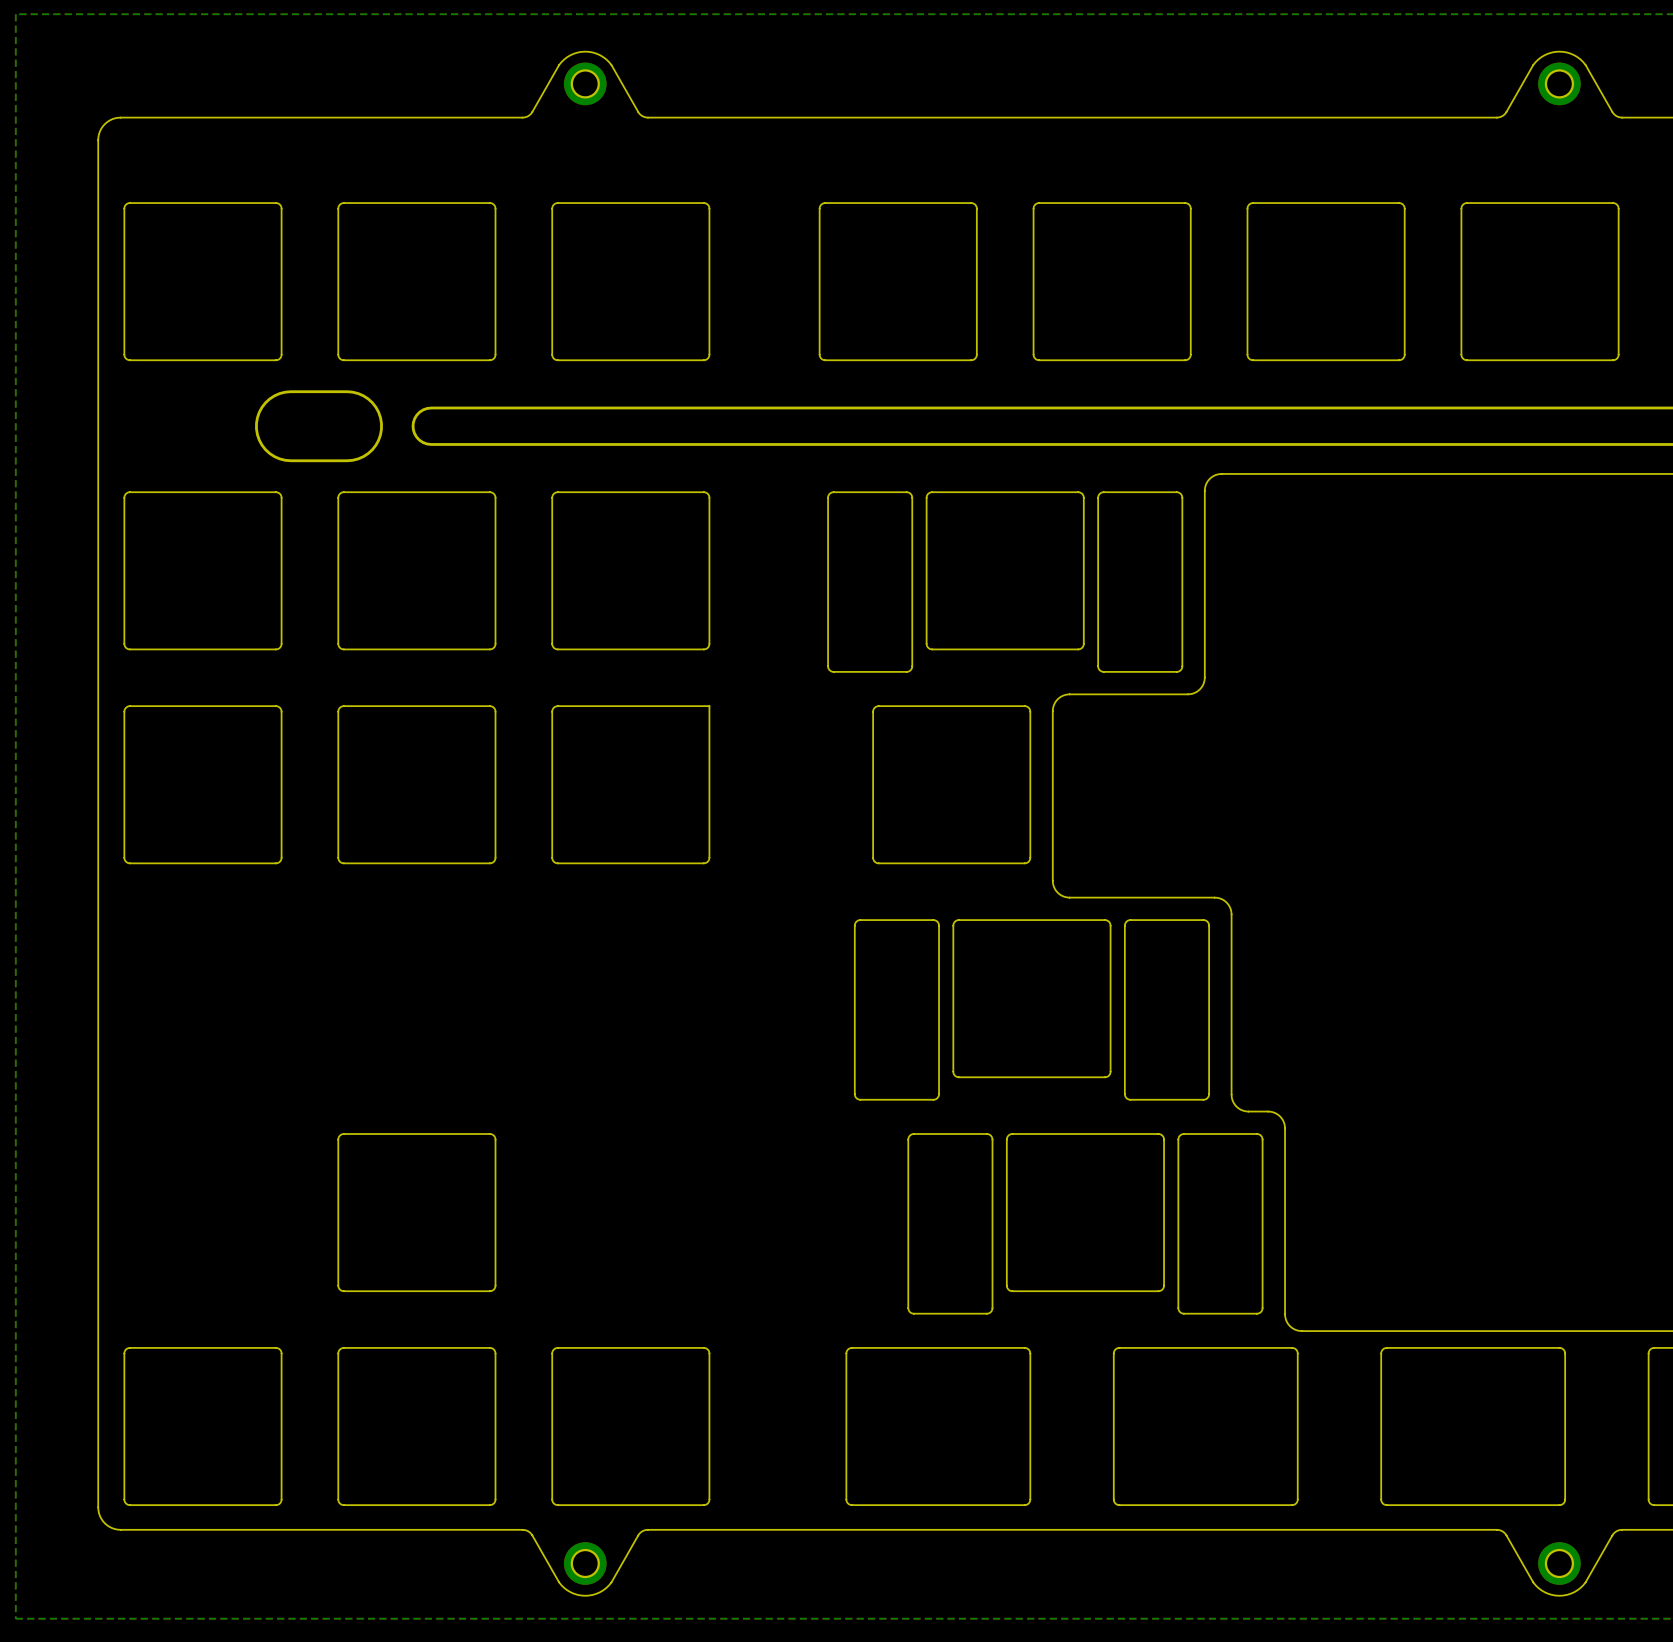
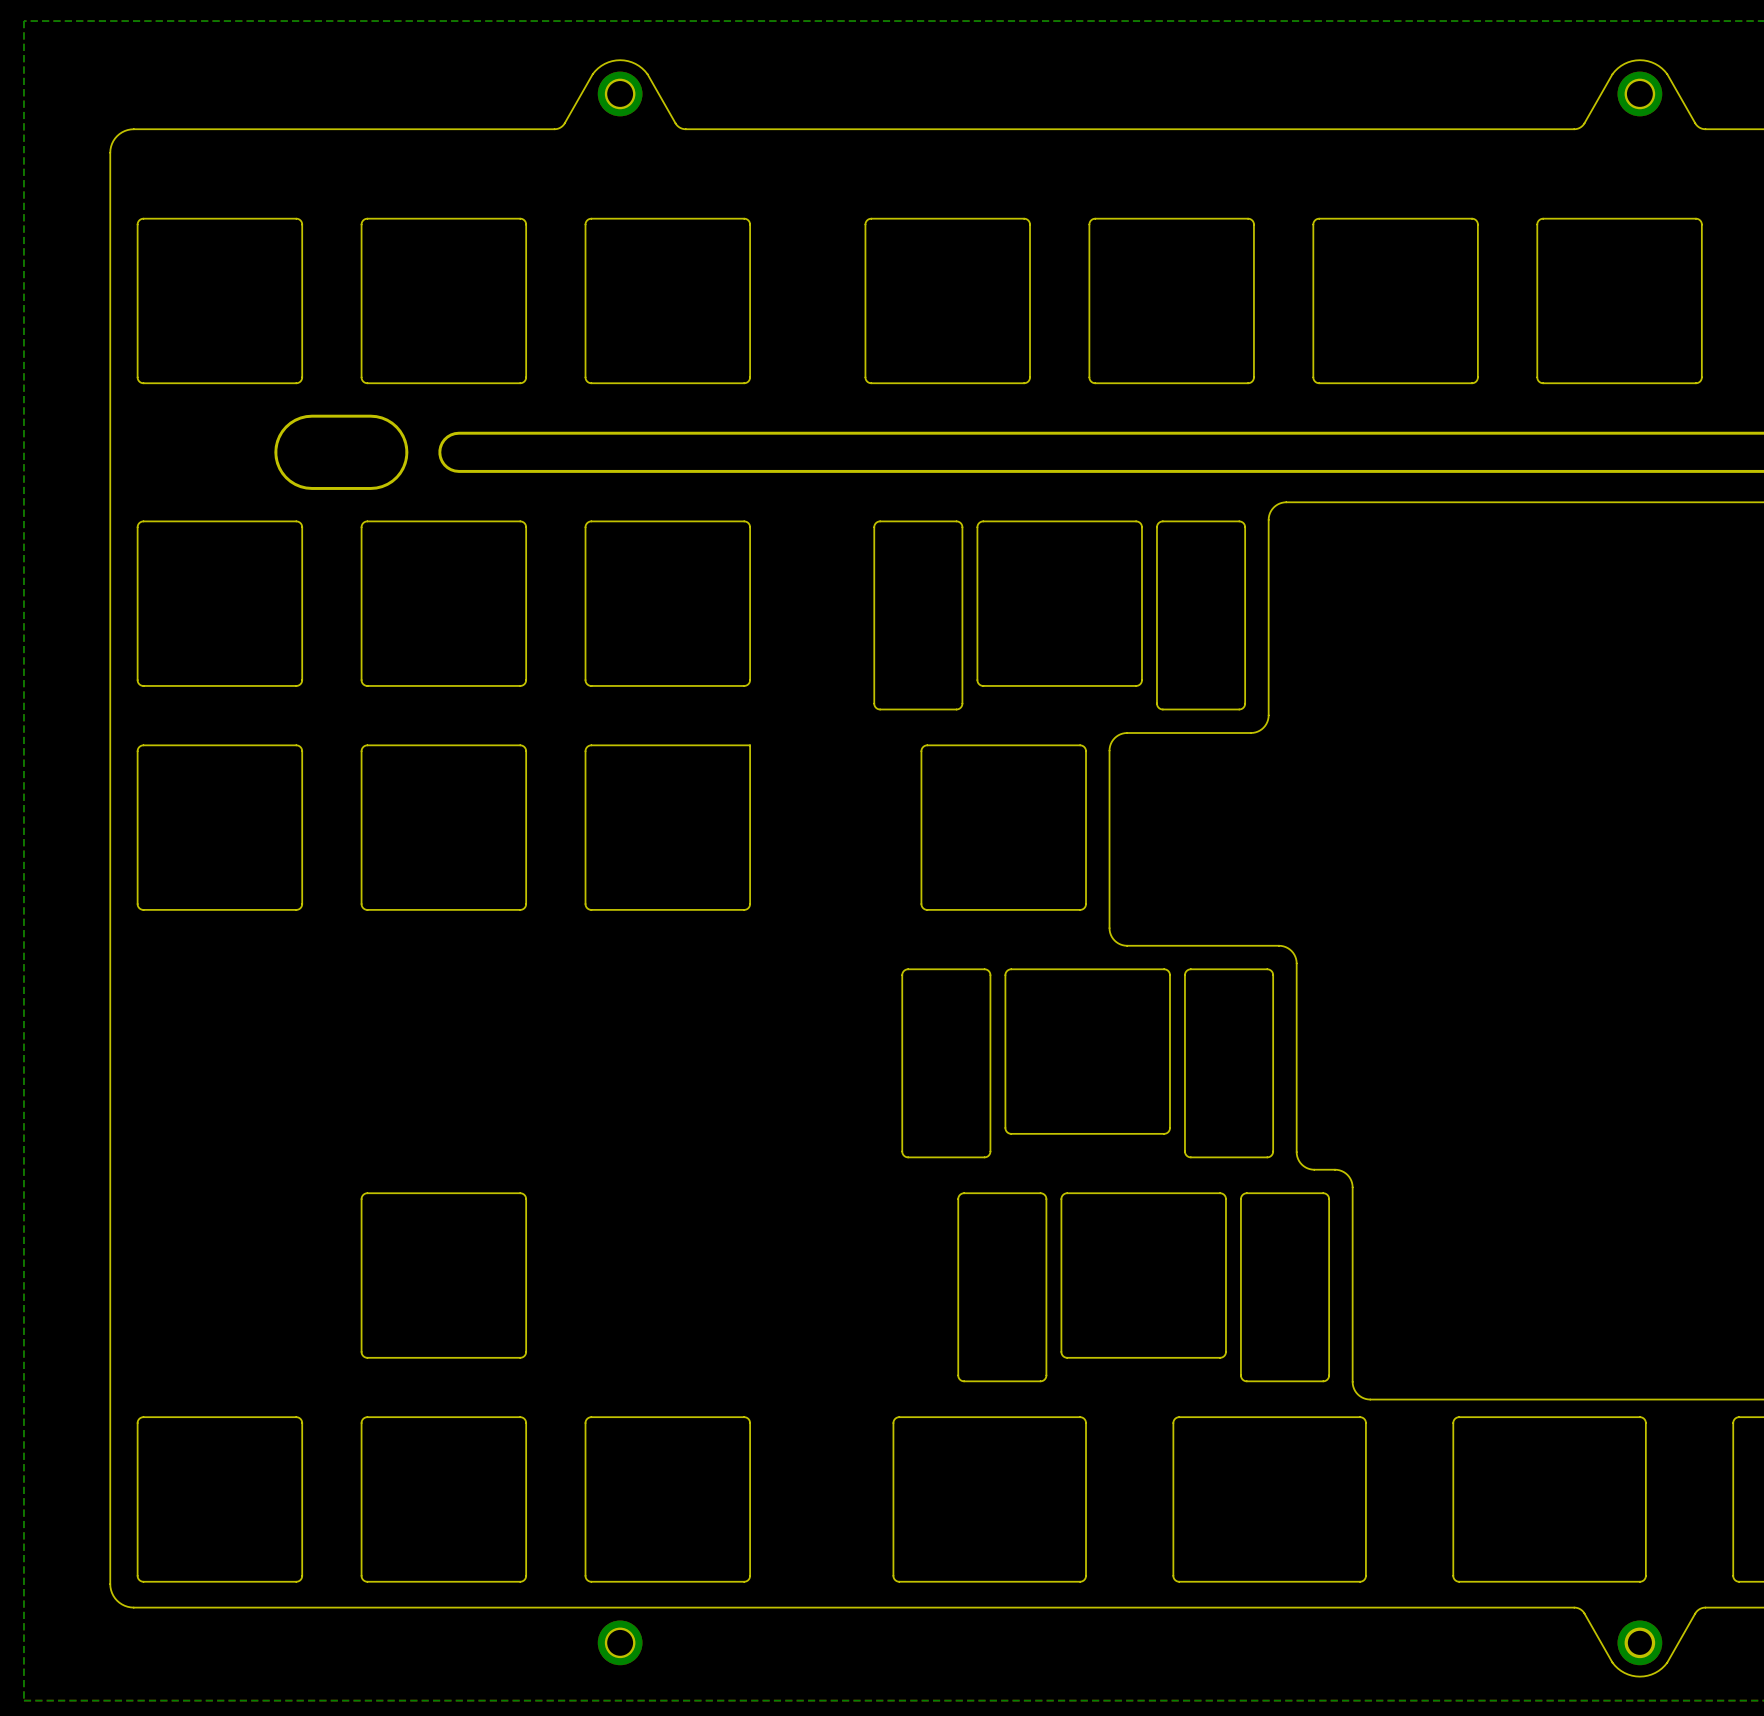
board edge: (647, 1529) (638, 1534) (609, 1585) (596, 1593) (585, 1595) (574, 1593) (561, 1585) (531, 1534) (522, 1529) -> (685, 1607) (554, 1607)
round board edge: none -> [1626, 1629, 1654, 1657]

